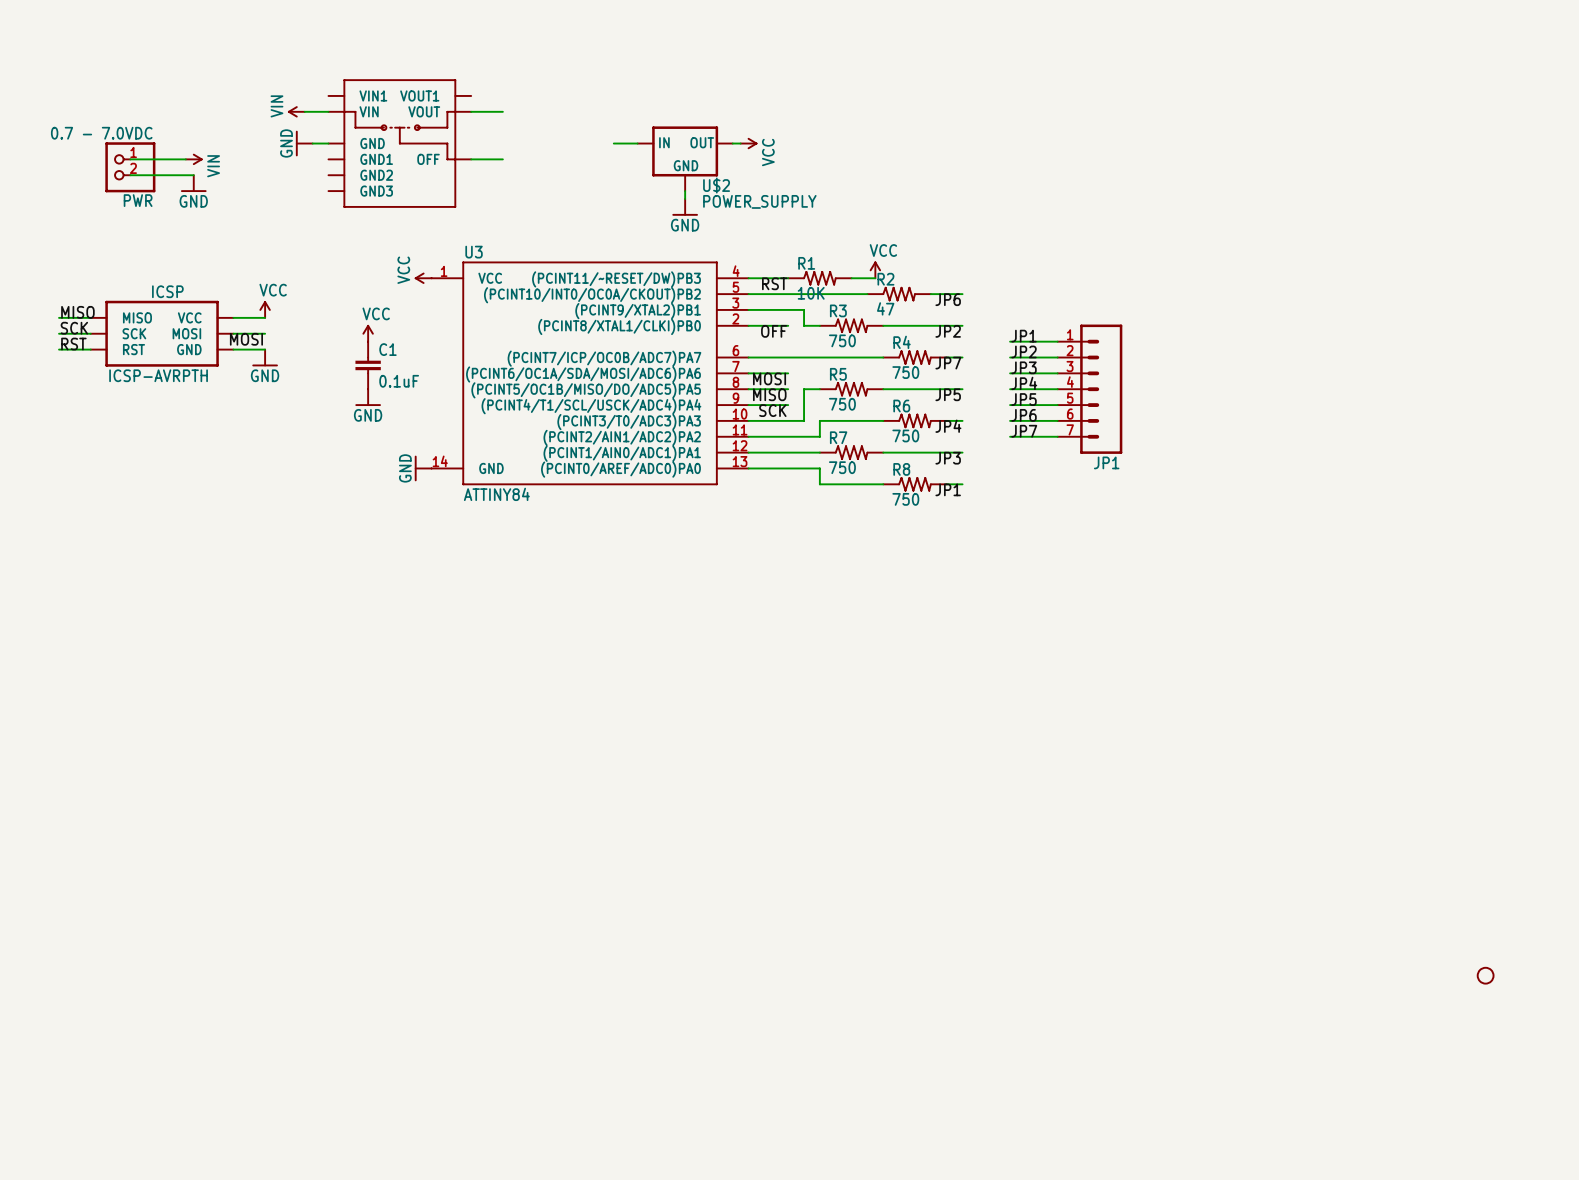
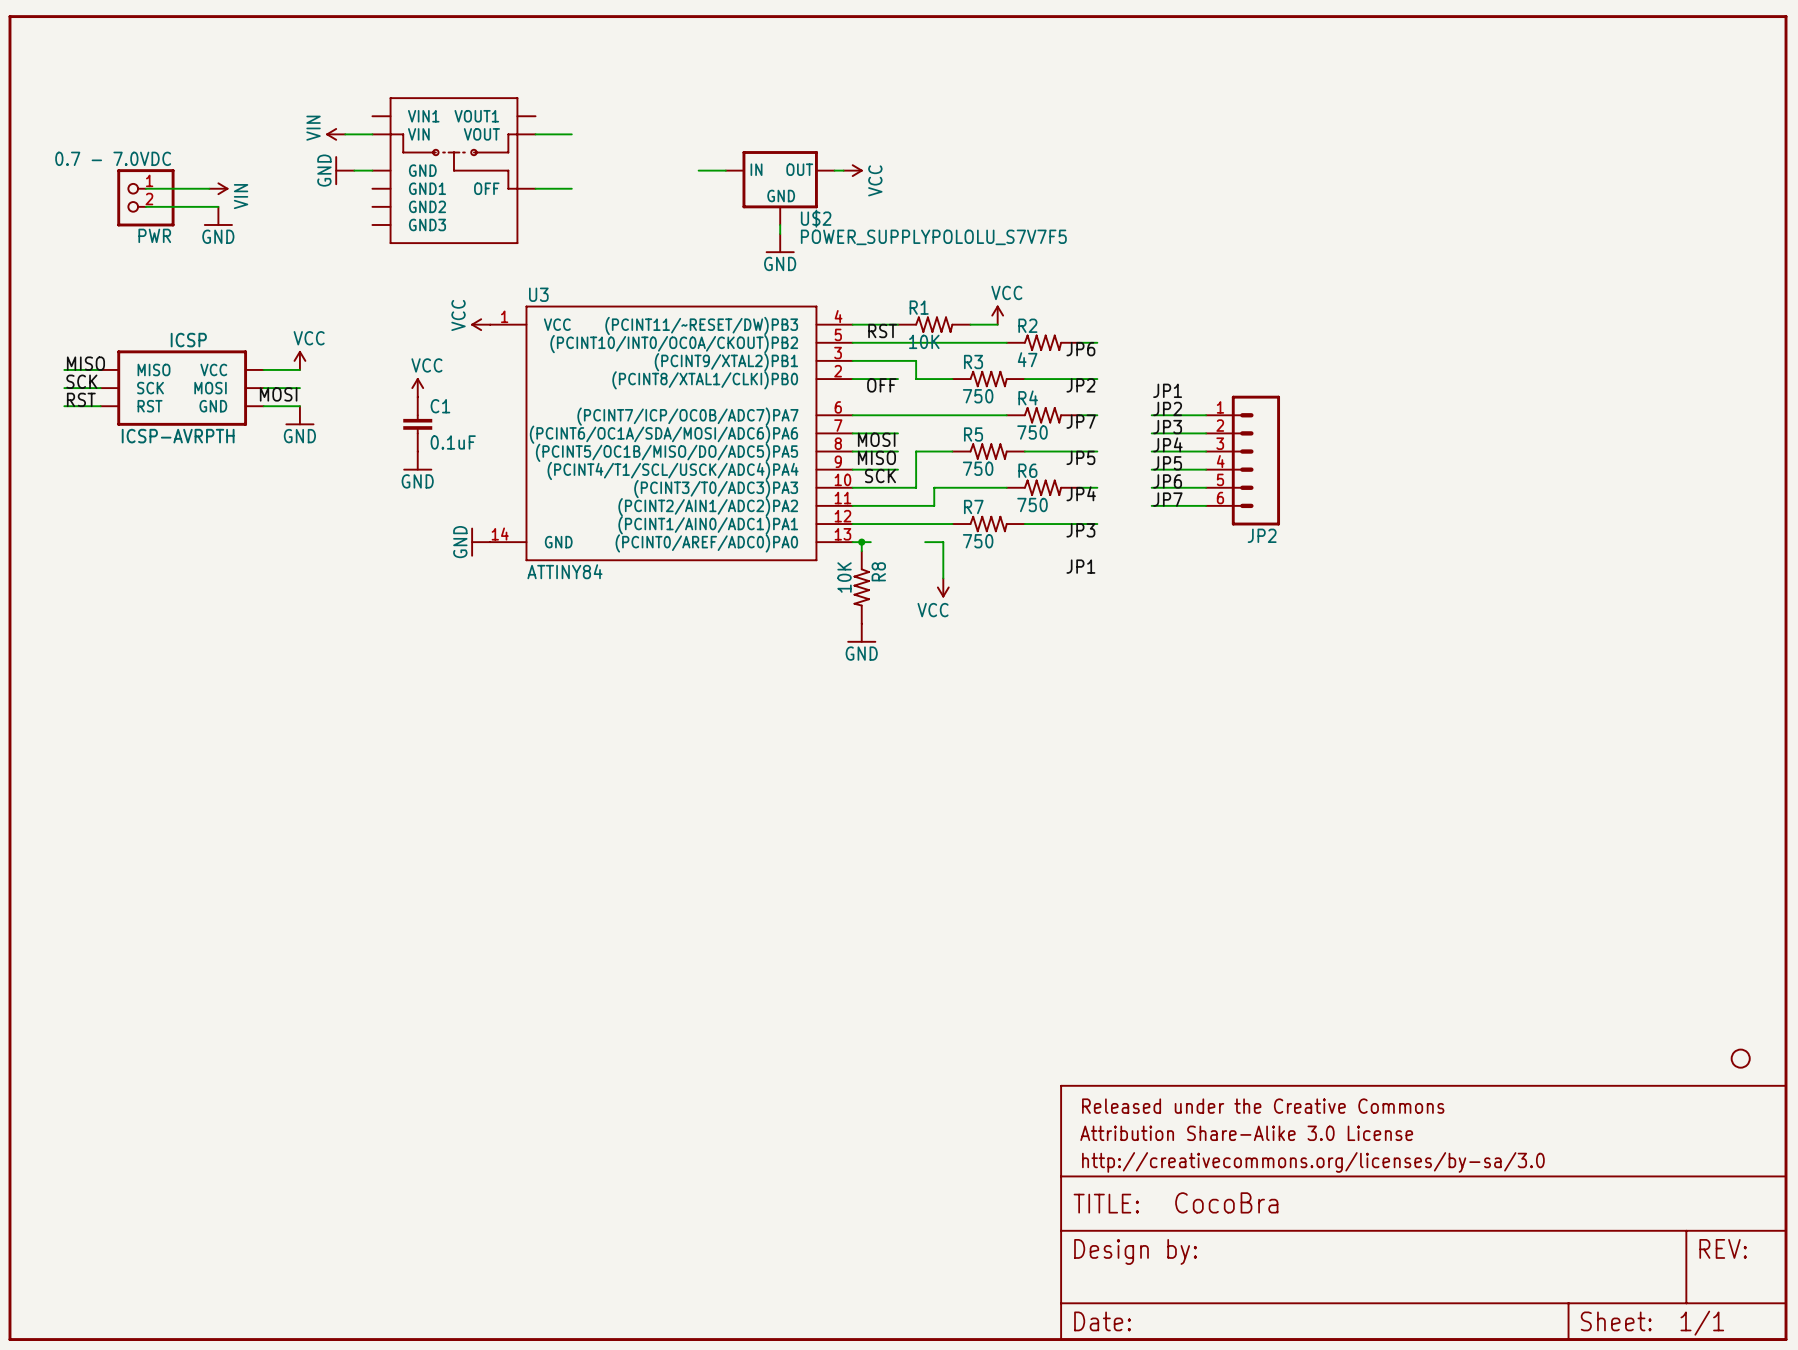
U$2 value: POWER_SUPPLY (759, 201) -> POWER_SUPPLYPOLOLU_S7V7F5 (933, 237)
R2 position: (899, 294) -> (1042, 342)
R3 position: (851, 325) -> (988, 379)
wire: (1010, 341) (1057, 341) -> none
R5 position: (851, 389) -> (988, 451)
JP1: (1089, 389) -> none
JP2: none -> (1243, 460)
R7 position: (851, 452) -> (988, 524)
wire: none -> (861, 542) (861, 551)
junction: none -> (861, 542)
wire: (764, 468) (811, 468) -> none
wire: (819, 468) (819, 484) (883, 484) -> (934, 542) (943, 542) (943, 578)
R8 rotation: 0° (914, 484) -> 90° clockwise (861, 587)
R8 position: (914, 484) -> (861, 587)
wire: (946, 484) (962, 484) -> none
R8 value: 750 (905, 499) -> 10K (844, 577)
power symbol: none -> VCC (943, 587)
power symbol: none -> GND (861, 633)
part: none -> (898, 678)
part position: (1485, 975) -> (1740, 1058)
part: none -> (1423, 1212)

